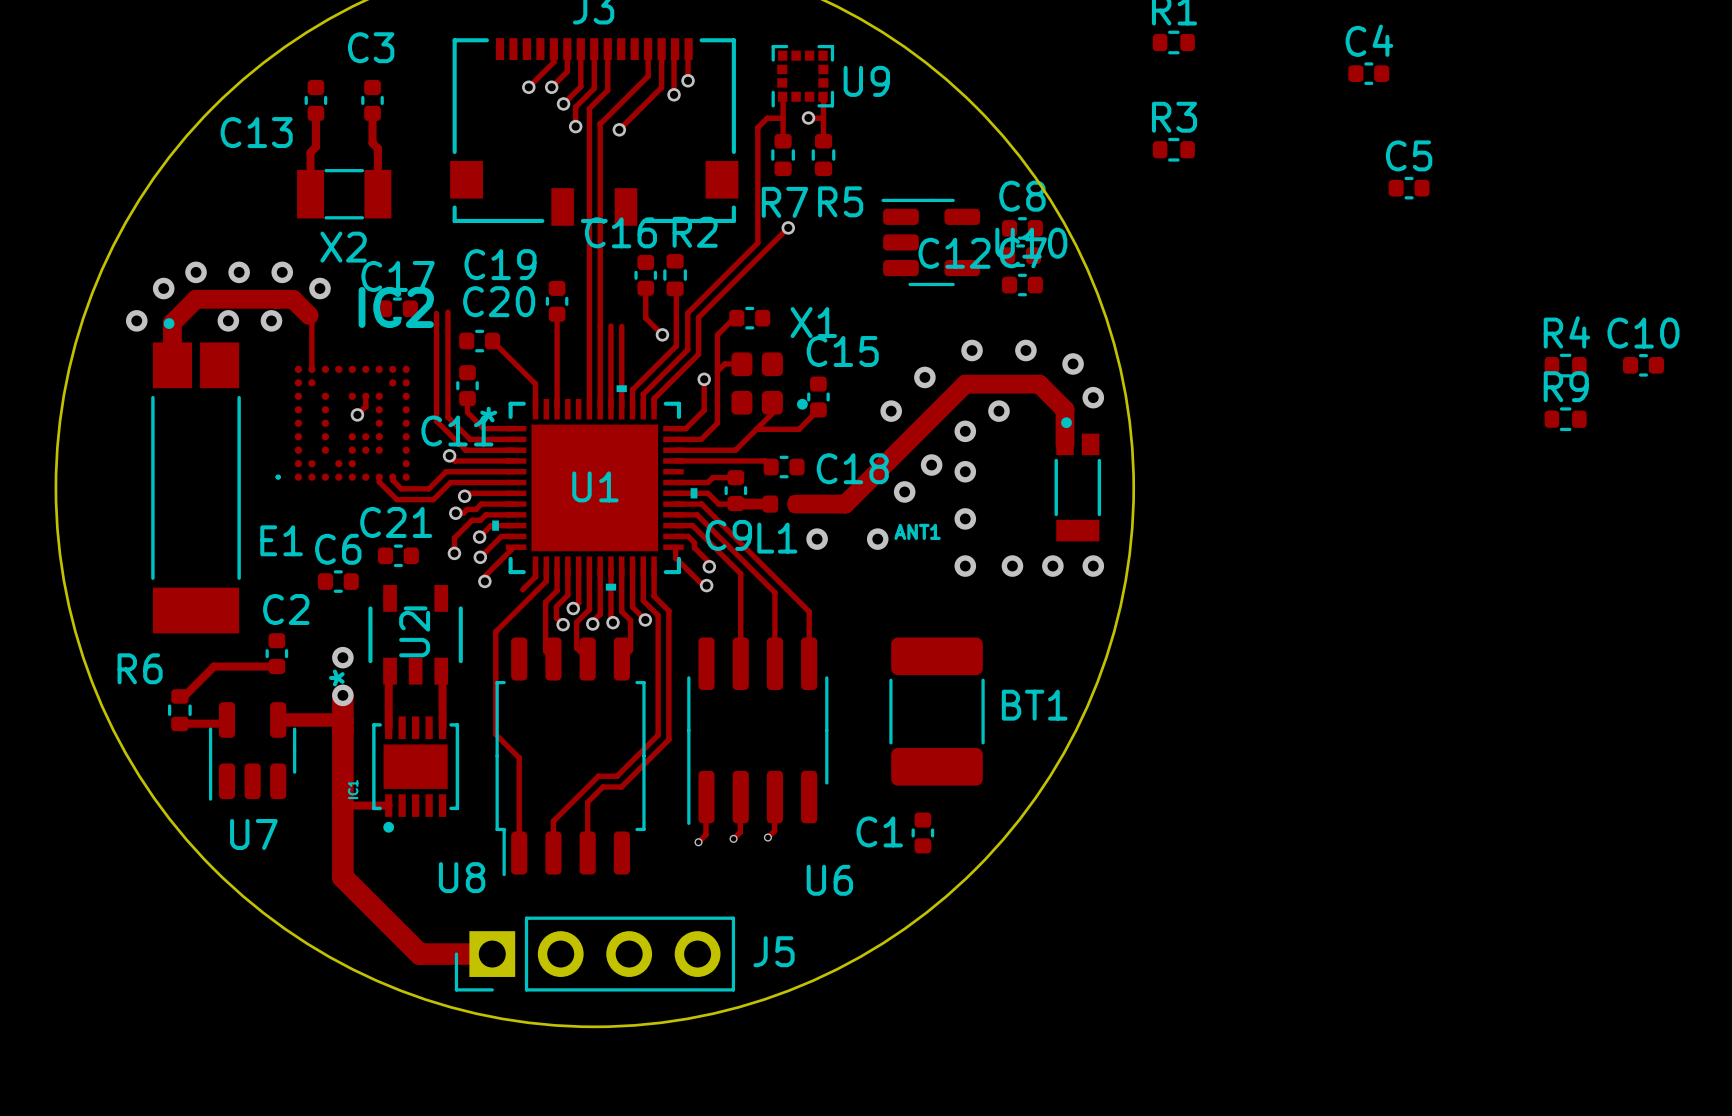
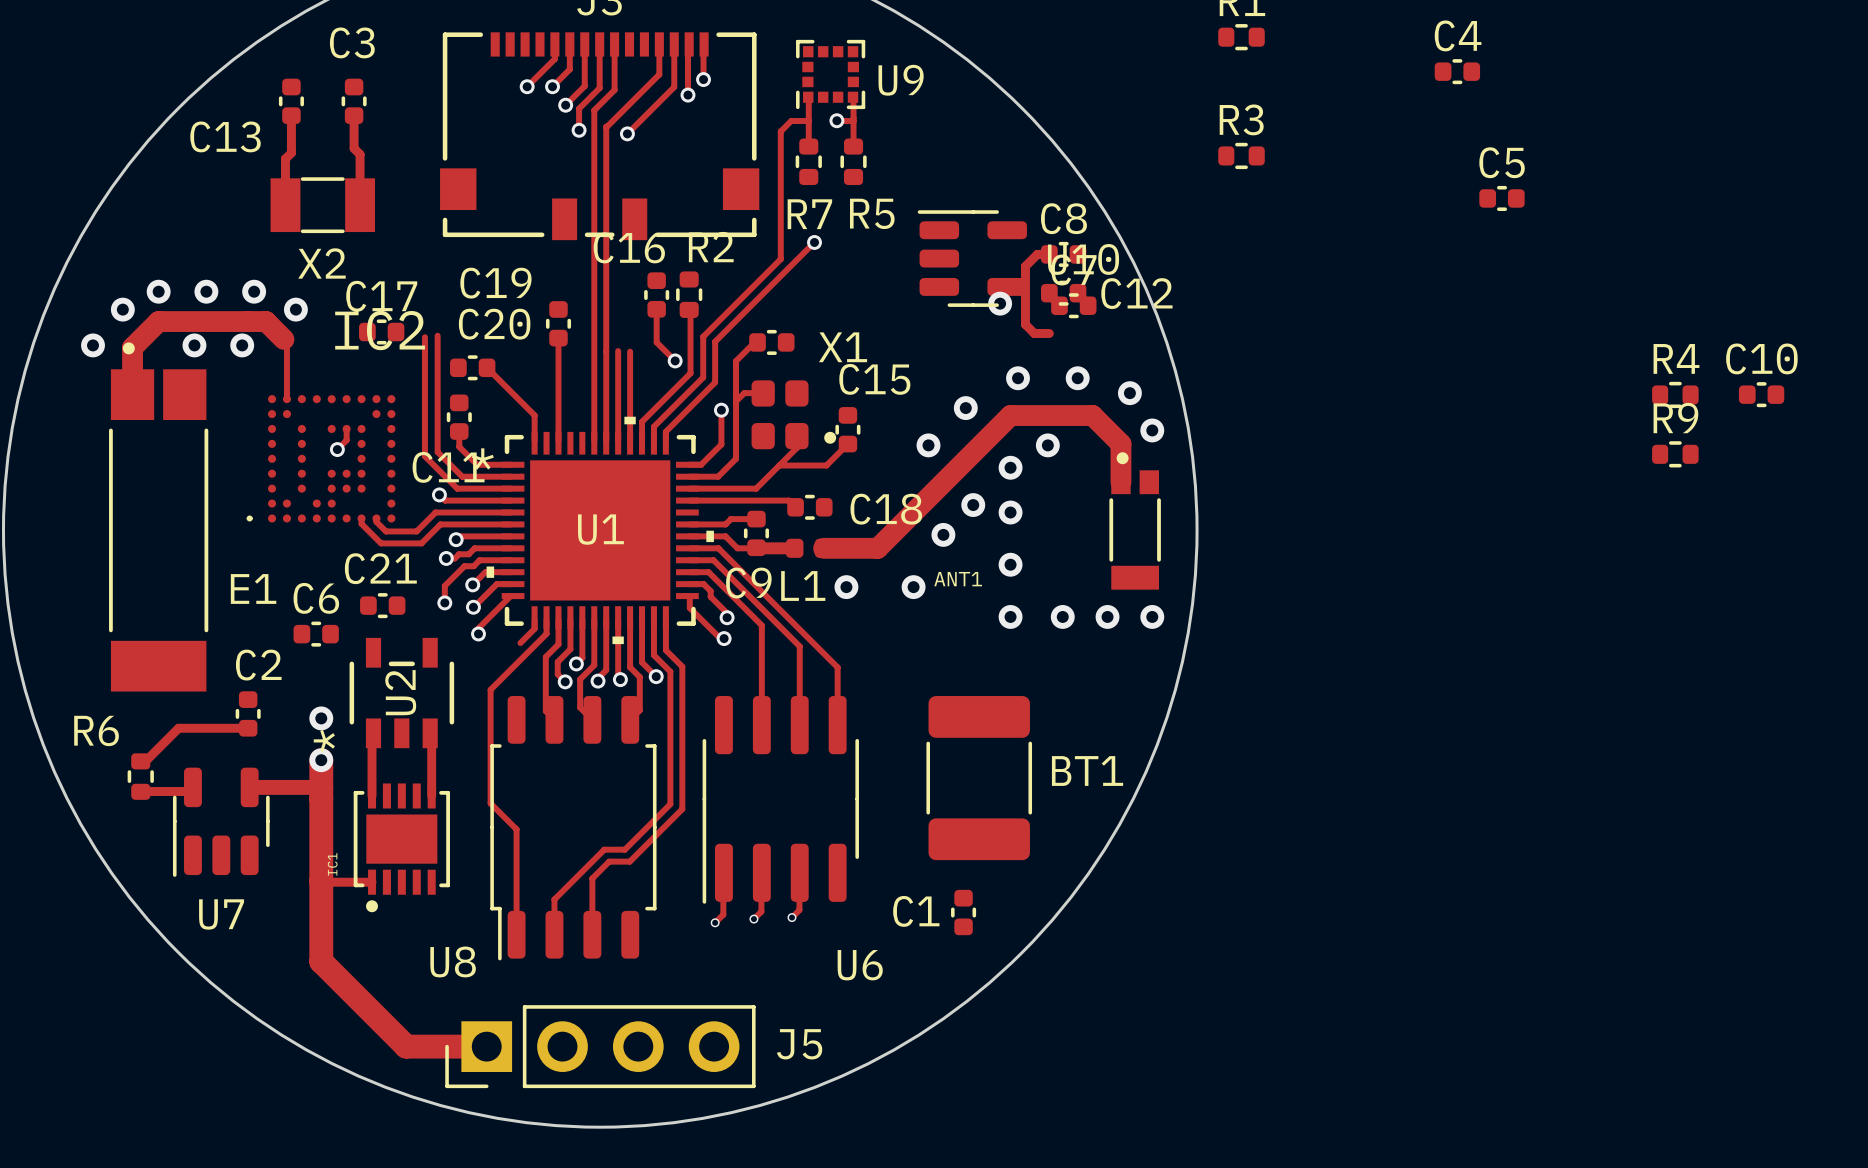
C8 position: (1022, 228) -> (1063, 254)
track: none -> (1049, 254) (1037, 254) (1025, 266) (1025, 324) (1034, 333) (1049, 333)
C12 name position: C12 (954, 253) -> C12 (1136, 293)
C12 position: (1020, 255) -> (1063, 293)
via: none -> (1000, 303)

